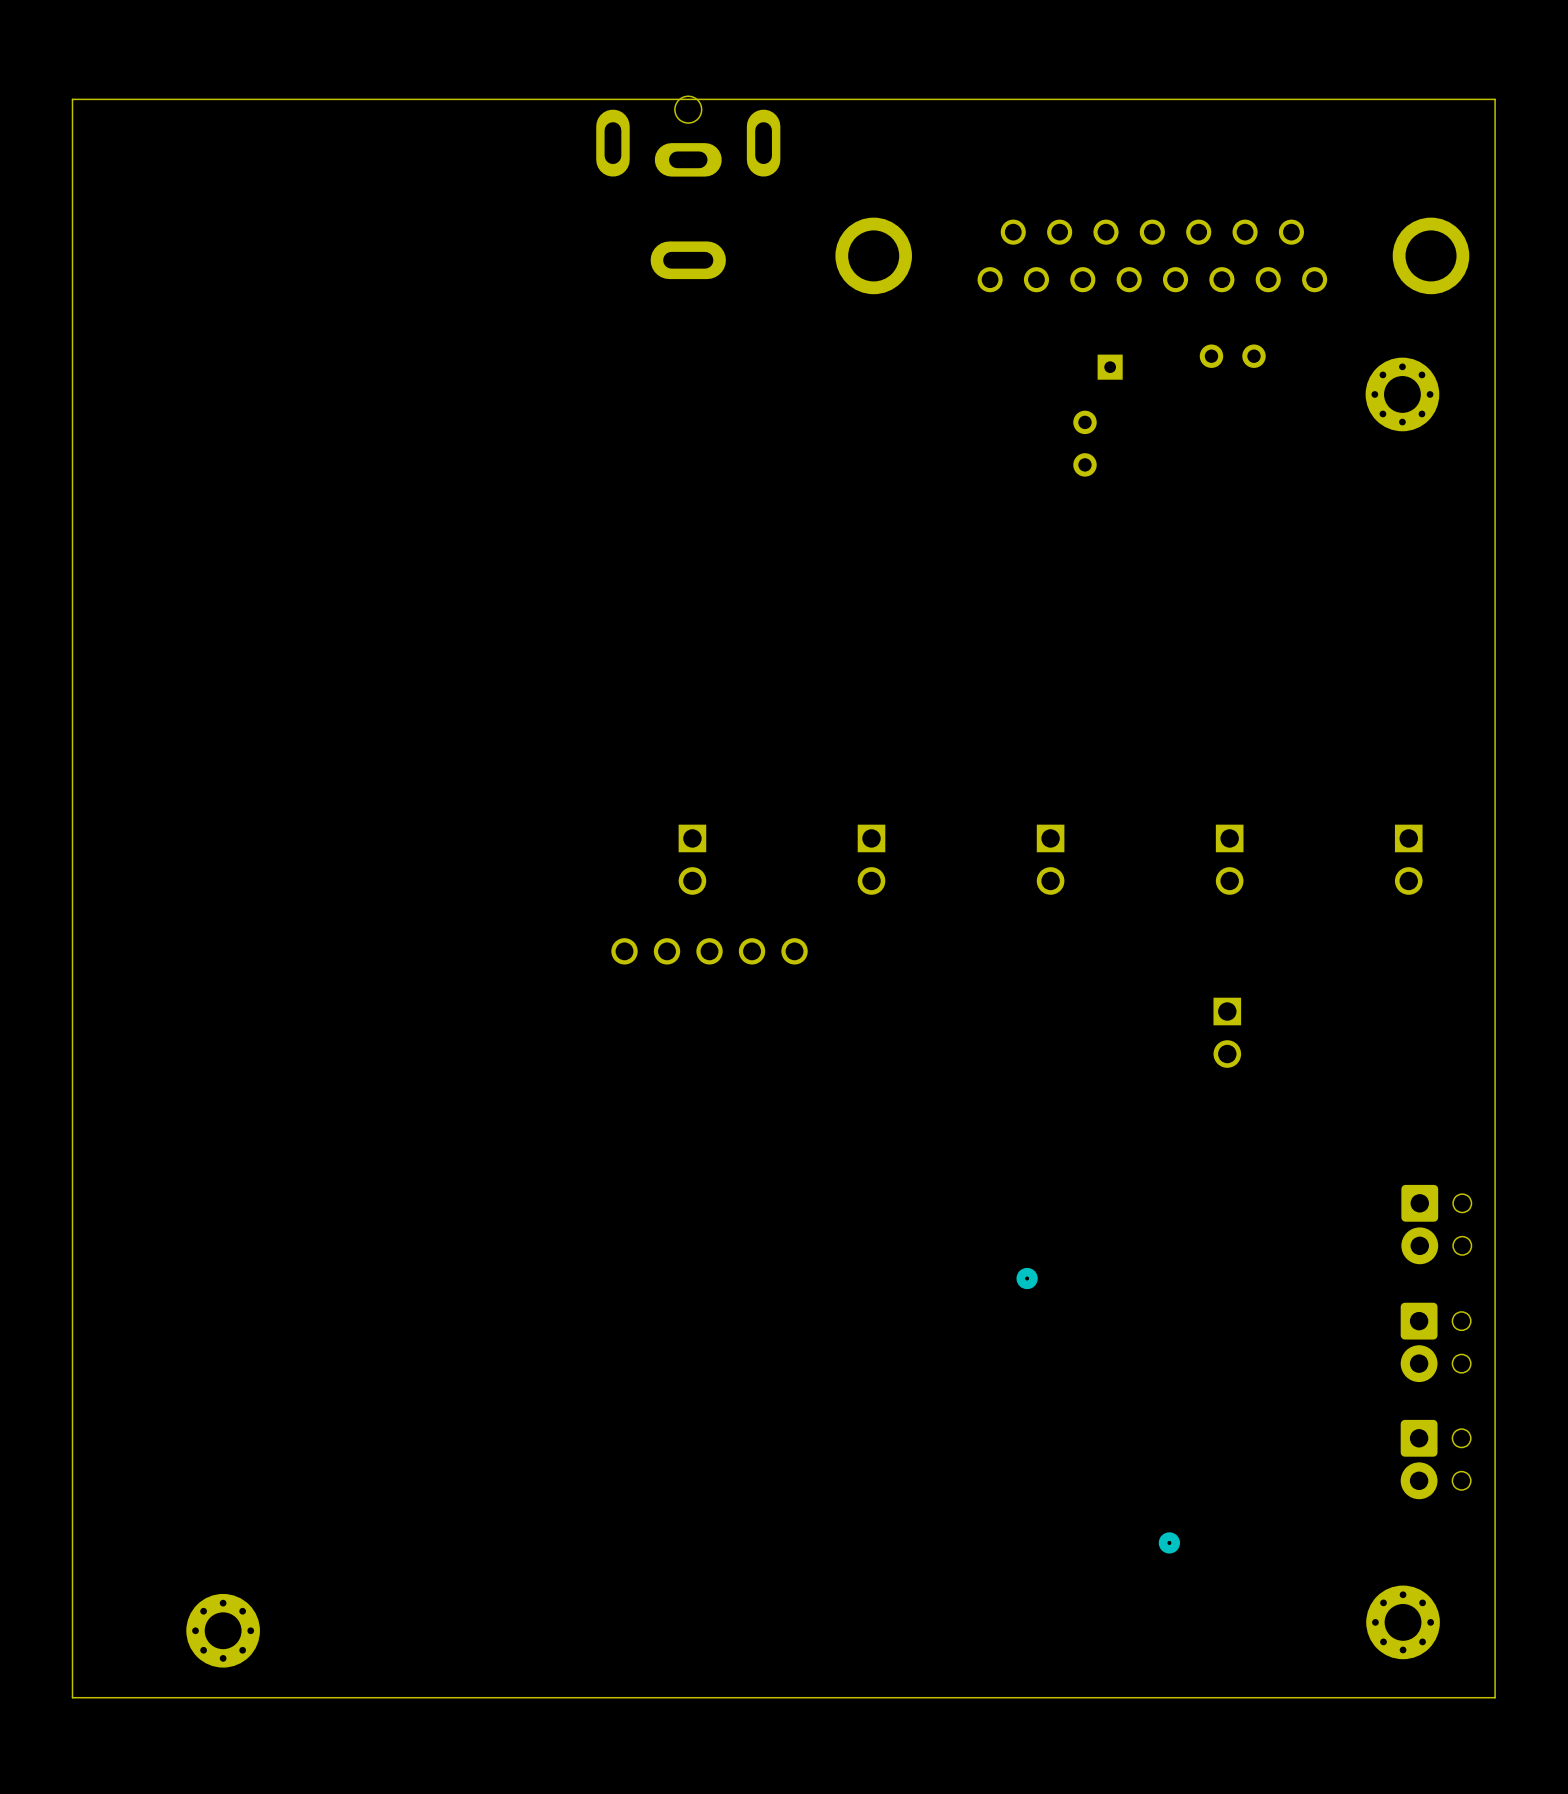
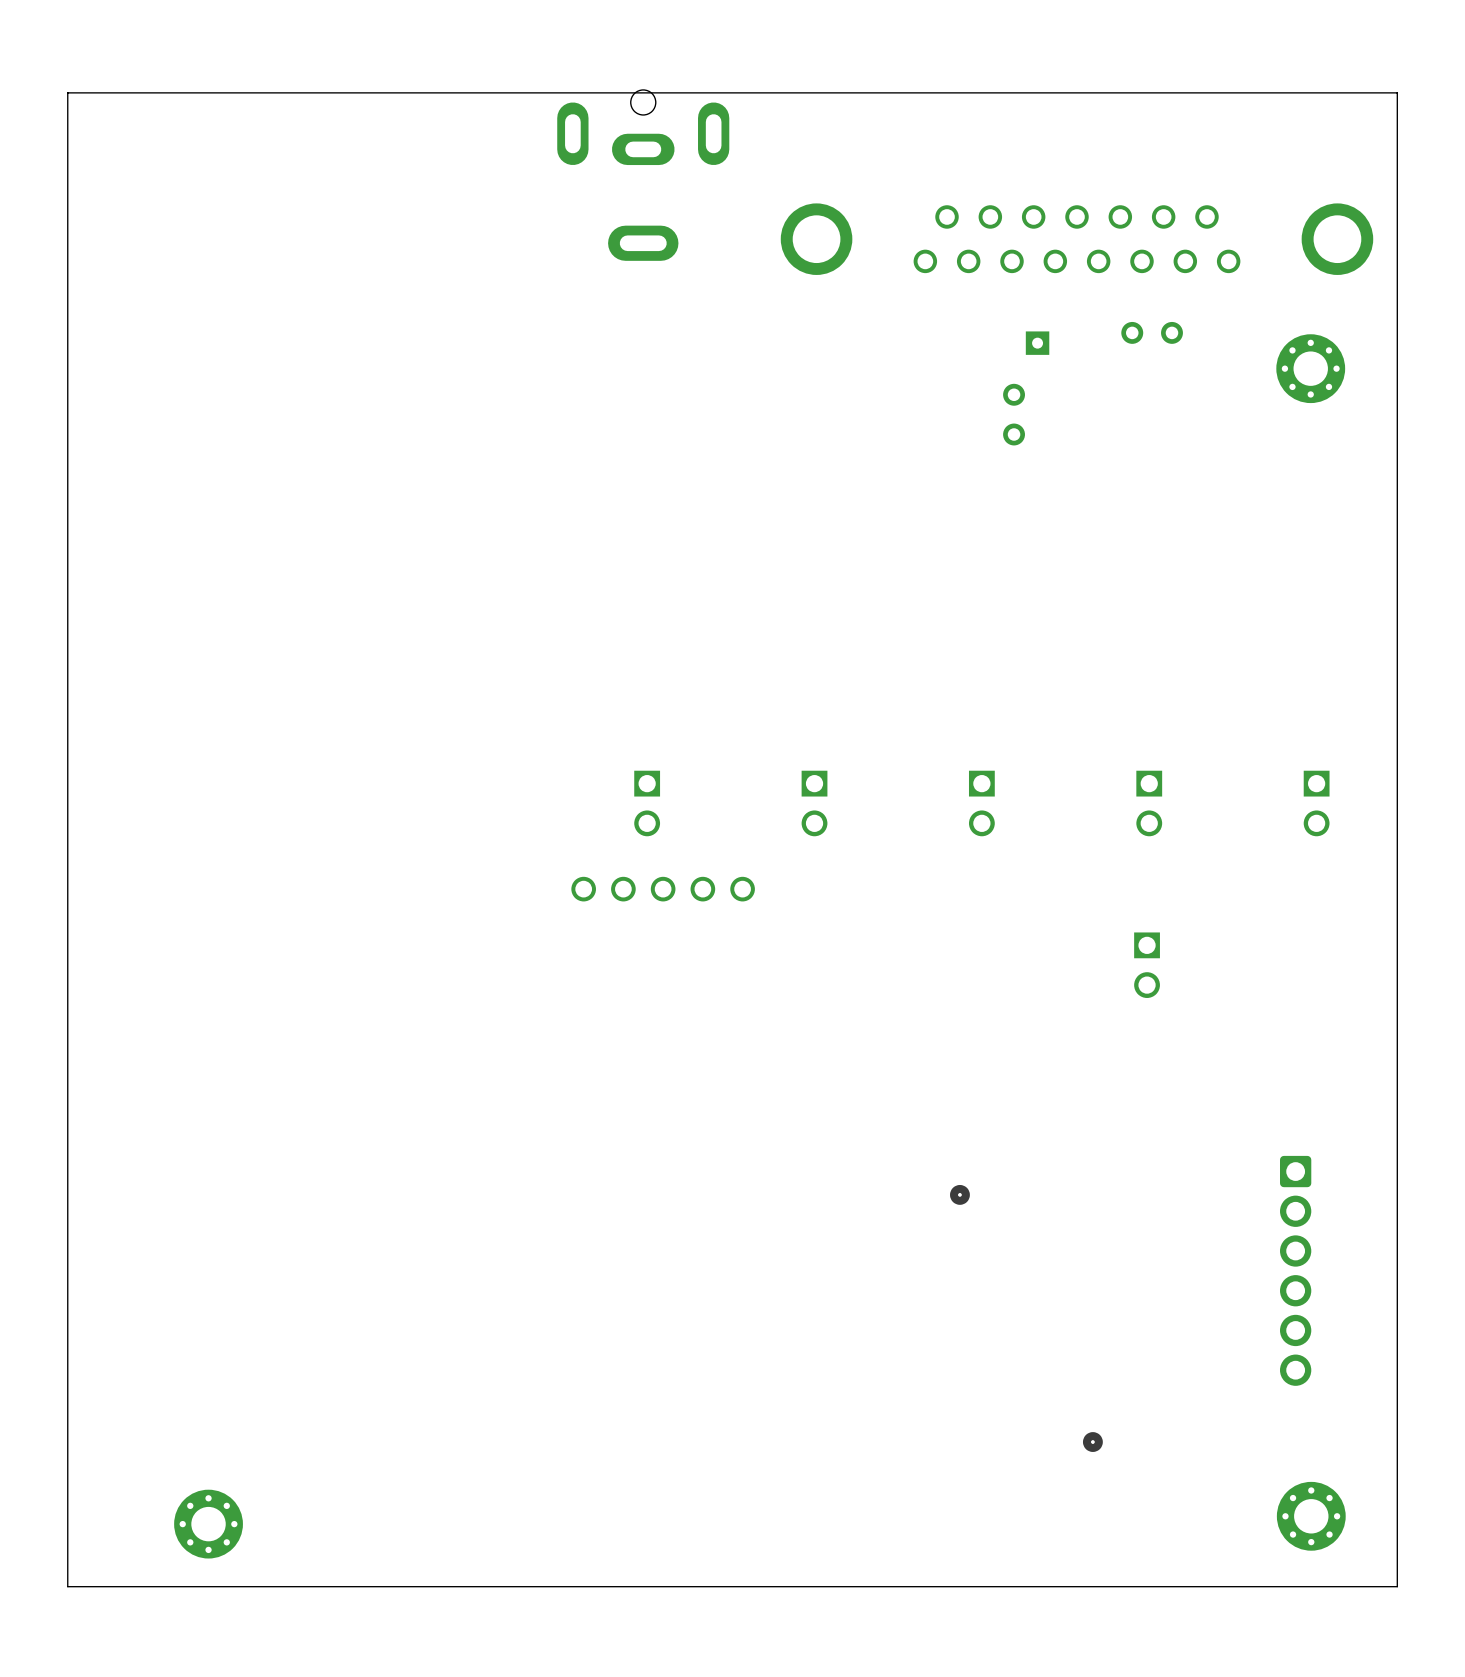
part: (1436, 1224) -> none
part: (1435, 1342) -> none
part: none -> (1295, 1270)
part: (1435, 1459) -> none

